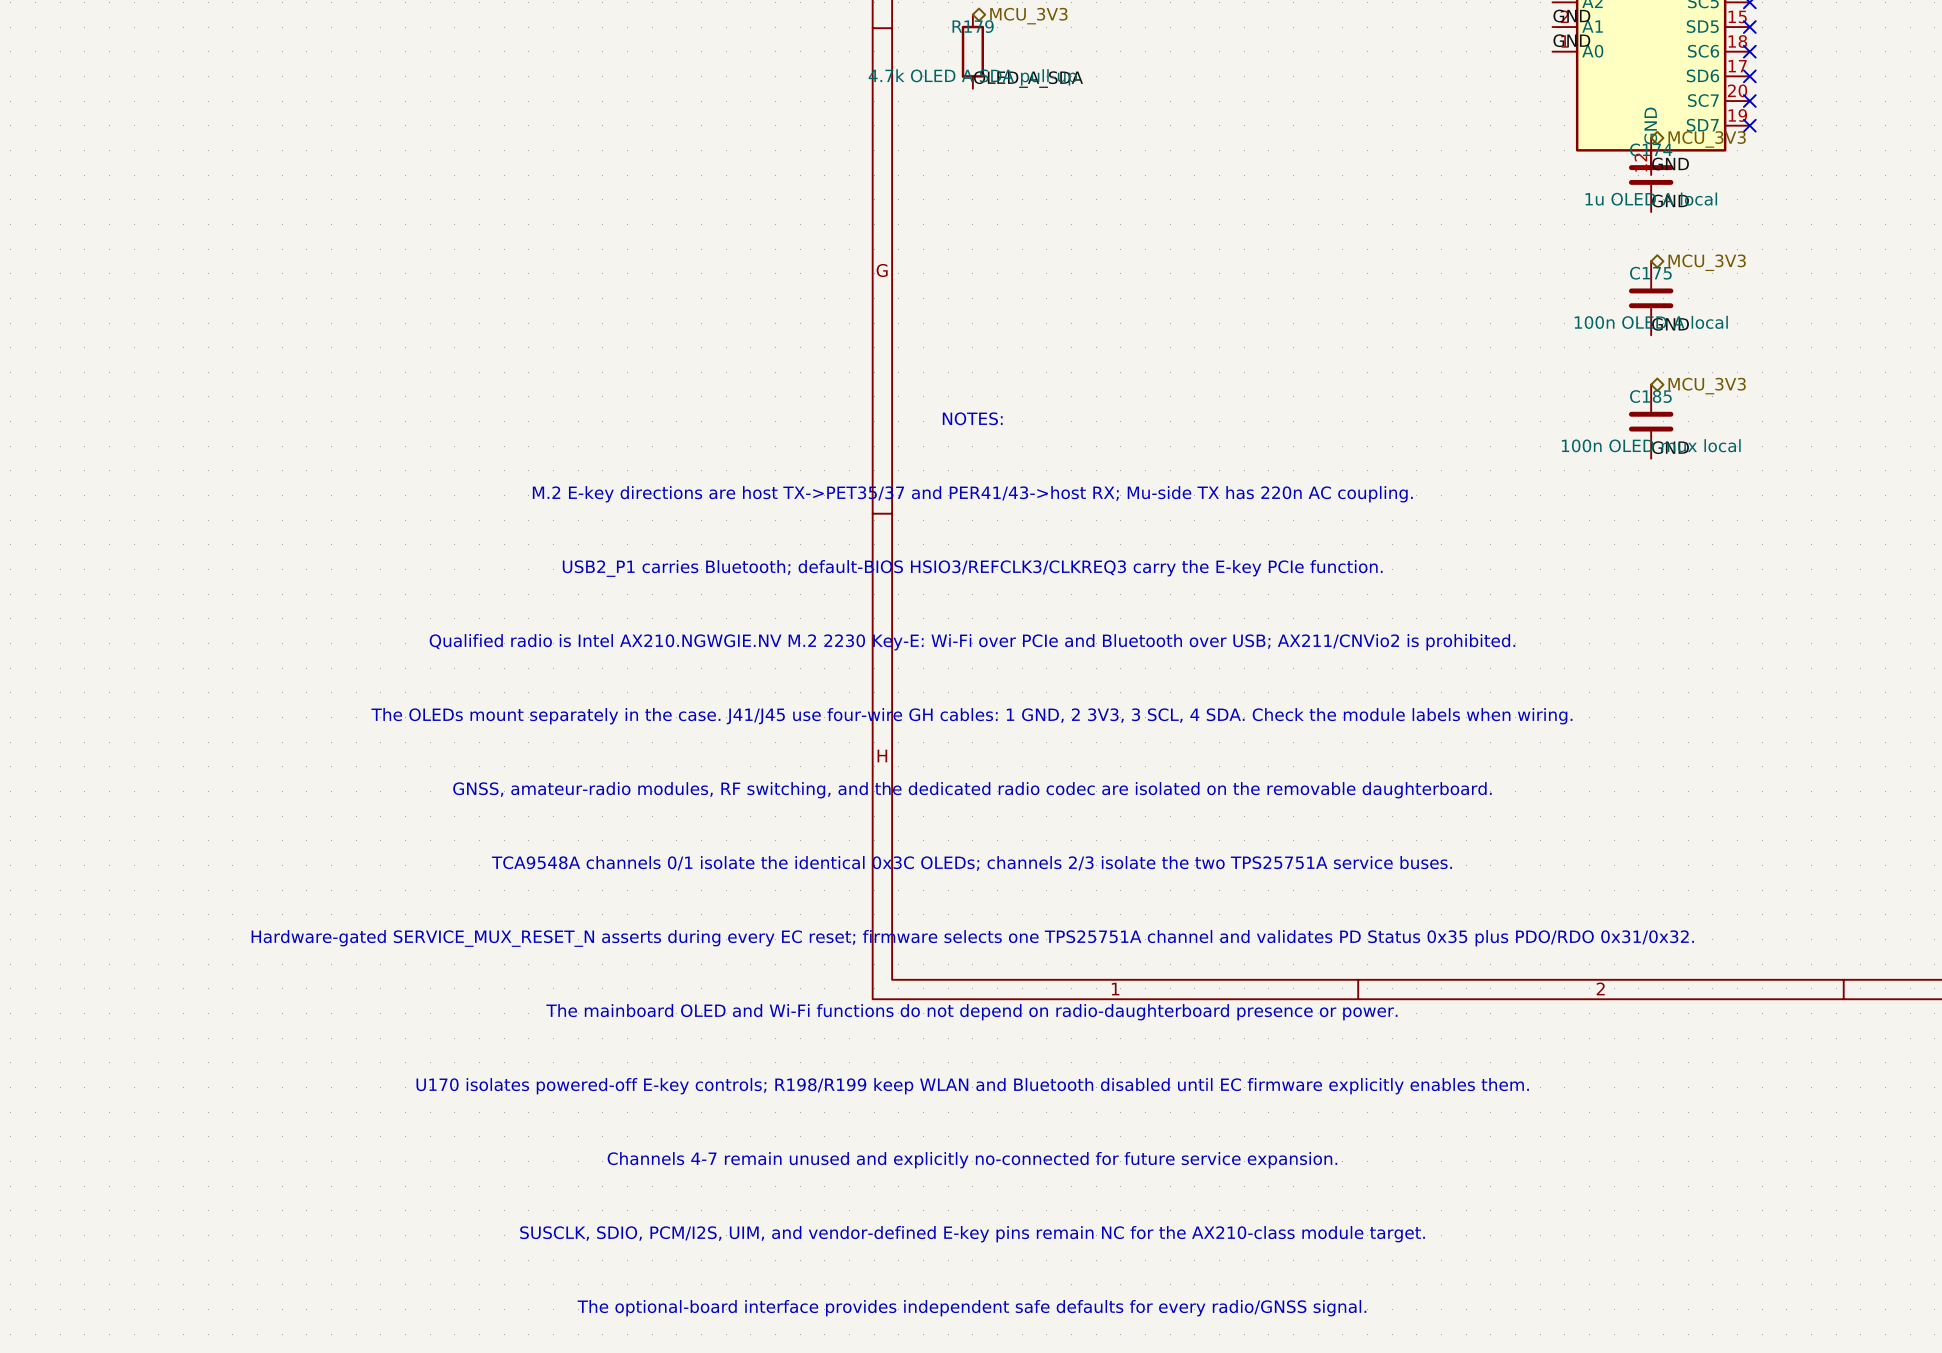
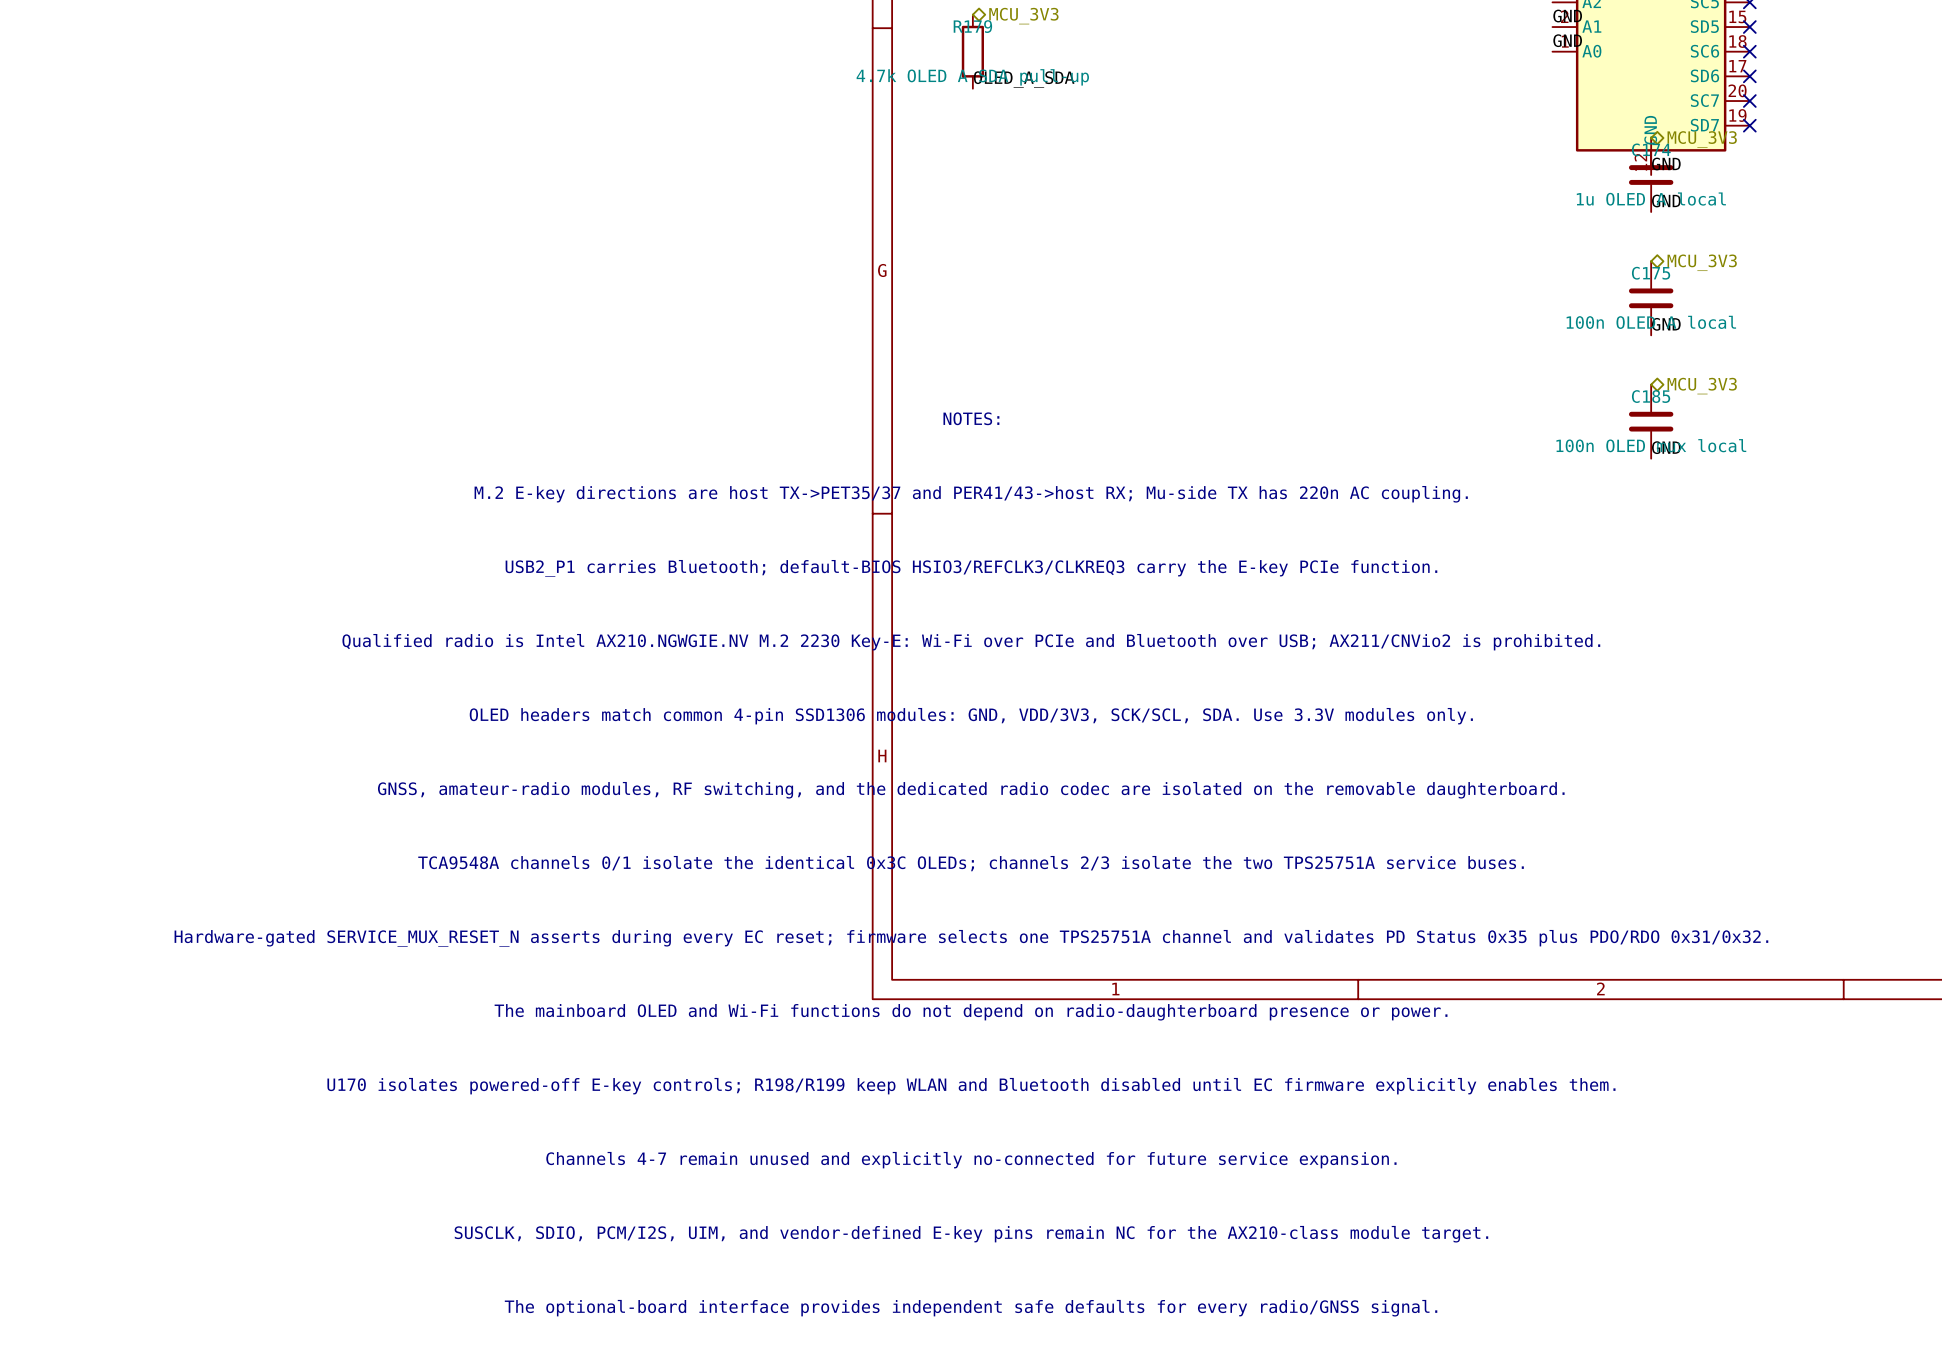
text: The OLEDs mount separately in the case. J41/J45 use four-wire GH cables: 1 GND, 2 3V3, 3 SCL, 4 SDA. Check the module labels when wiring. (971, 716) -> OLED headers match common 4-pin SSD1306 modules: GND, VDD/3V3, SCK/SCL, SDA. Use 3.3V modules only. (971, 716)

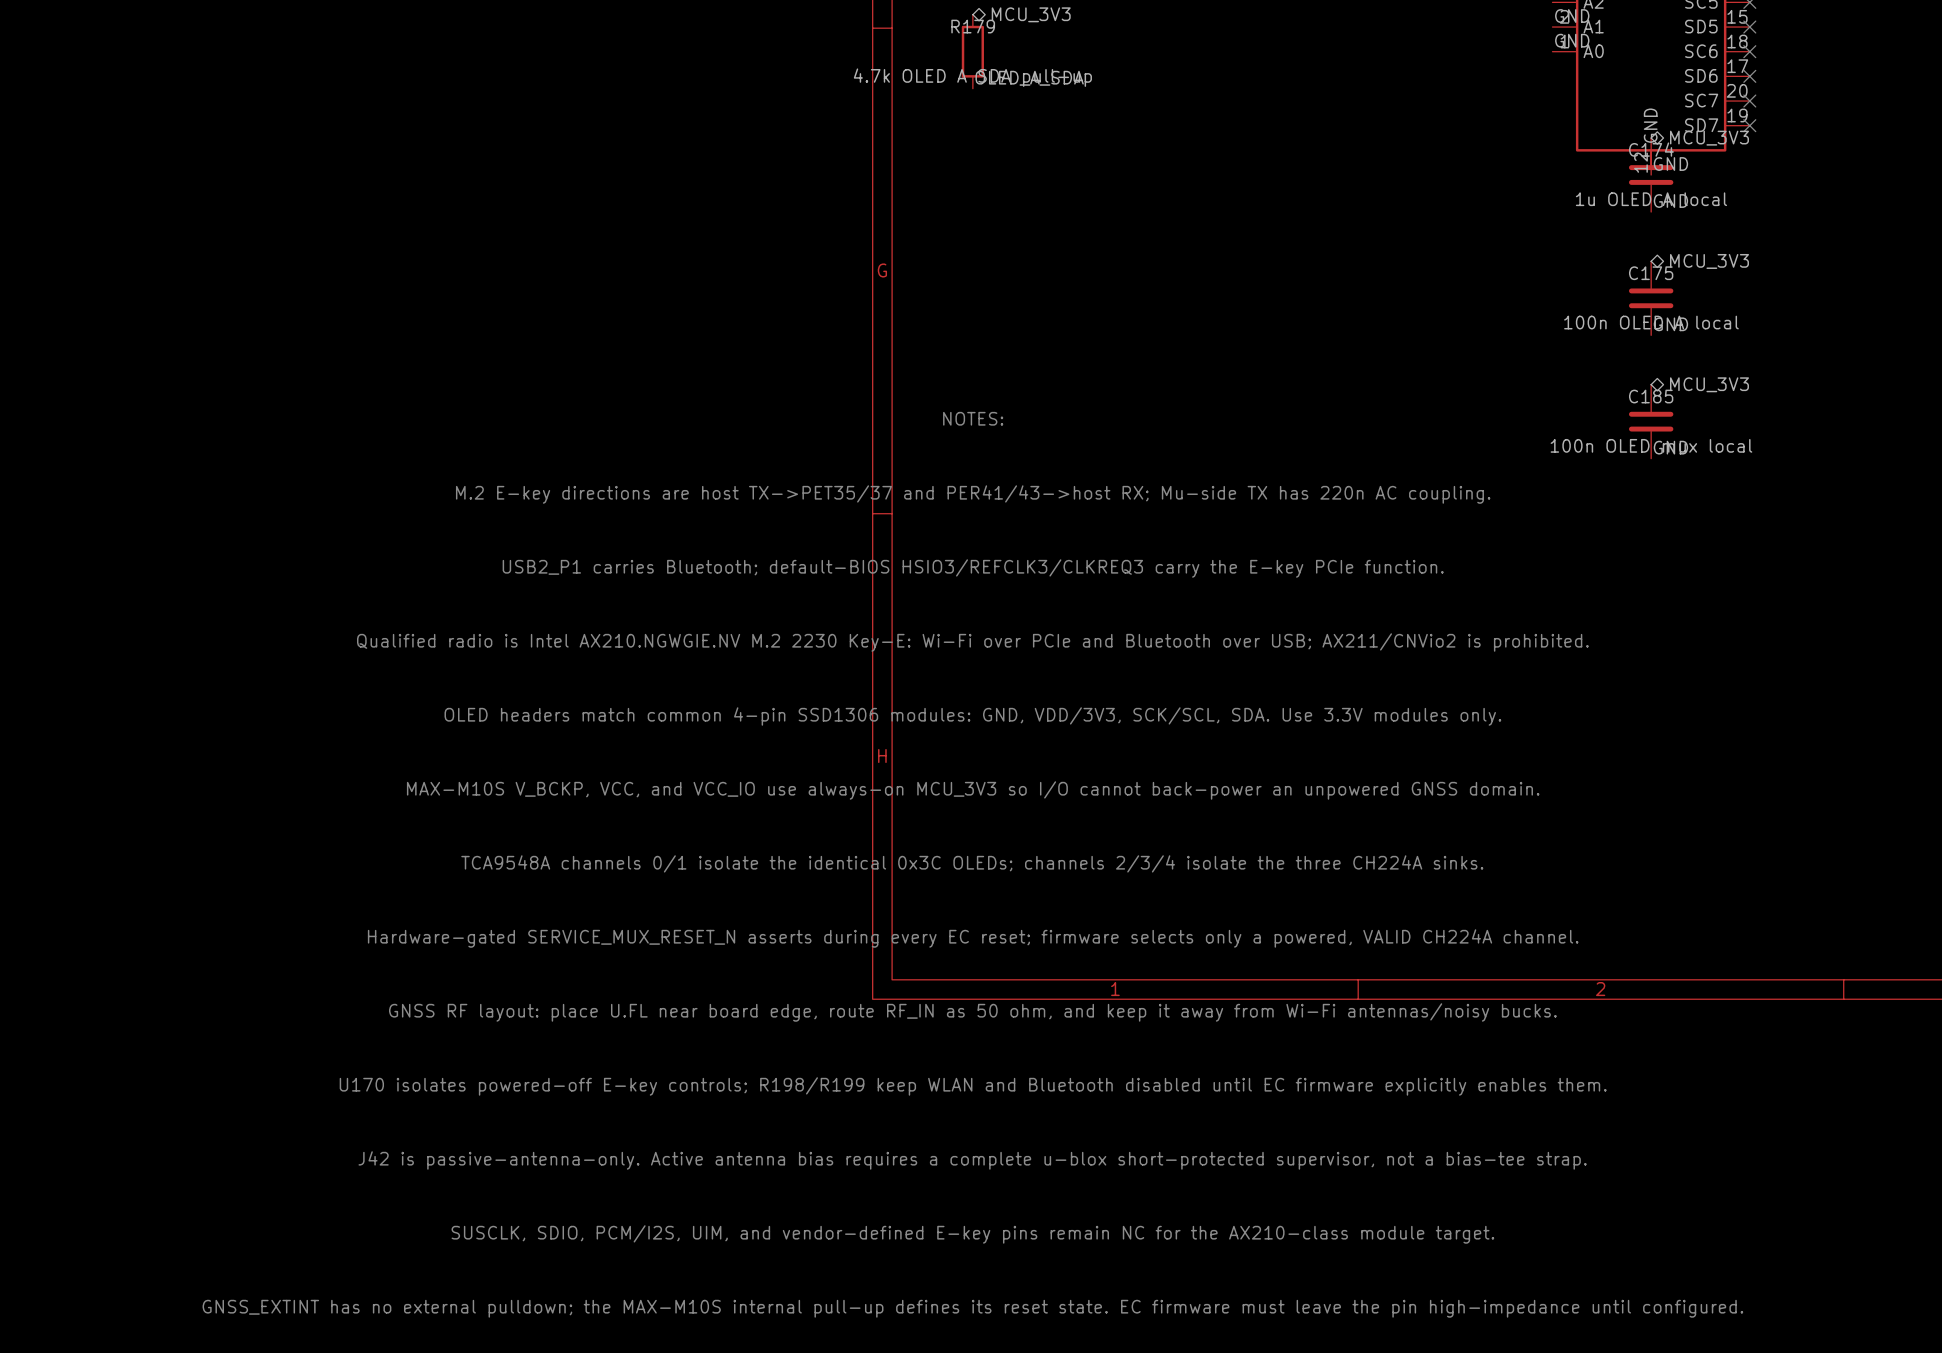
text: GNSS, amateur-radio modules, RF switching, and the dedicated radio codec are isolated on the removable daughterboard. (971, 790) -> MAX-M10S V_BCKP, VCC, and VCC_IO use always-on MCU_3V3 so I/O cannot back-power an unpowered GNSS domain. (973, 790)
text: TCA9548A channels 0/1 isolate the identical 0x3C OLEDs; channels 2/3 isolate the two TPS25751A service buses. (971, 863) -> TCA9548A channels 0/1 isolate the identical 0x3C OLEDs; channels 2/3/4 isolate the three CH224A sinks. (972, 863)
text: Hardware-gated SERVICE_MUX_RESET_N asserts during every EC reset; firmware selects one TPS25751A channel and validates PD Status 0x35 plus PDO/RDO 0x31/0x32. (971, 938) -> Hardware-gated SERVICE_MUX_RESET_N asserts during every EC reset; firmware selects only a powered, VALID CH224A channel. (973, 938)
text: The mainboard OLED and Wi-Fi functions do not depend on radio-daughterboard presence or power. (971, 1012) -> GNSS RF layout: place U.FL near board edge, route RF_IN as 50 ohm, and keep it away from Wi-Fi antennas/noisy bucks. (972, 1012)
text: Channels 4-7 remain unused and explicitly no-connected for future service expansion. (971, 1160) -> J42 is passive-antenna-only. Active antenna bias requires a complete u-blox short-protected supervisor, not a bias-tee strap. (972, 1160)
text: The optional-board interface provides independent safe defaults for every radio/GNSS signal. (971, 1308) -> GNSS_EXTINT has no external pulldown; the MAX-M10S internal pull-up defines its reset state. EC firmware must leave the pin high-impedance until configured. (972, 1308)

